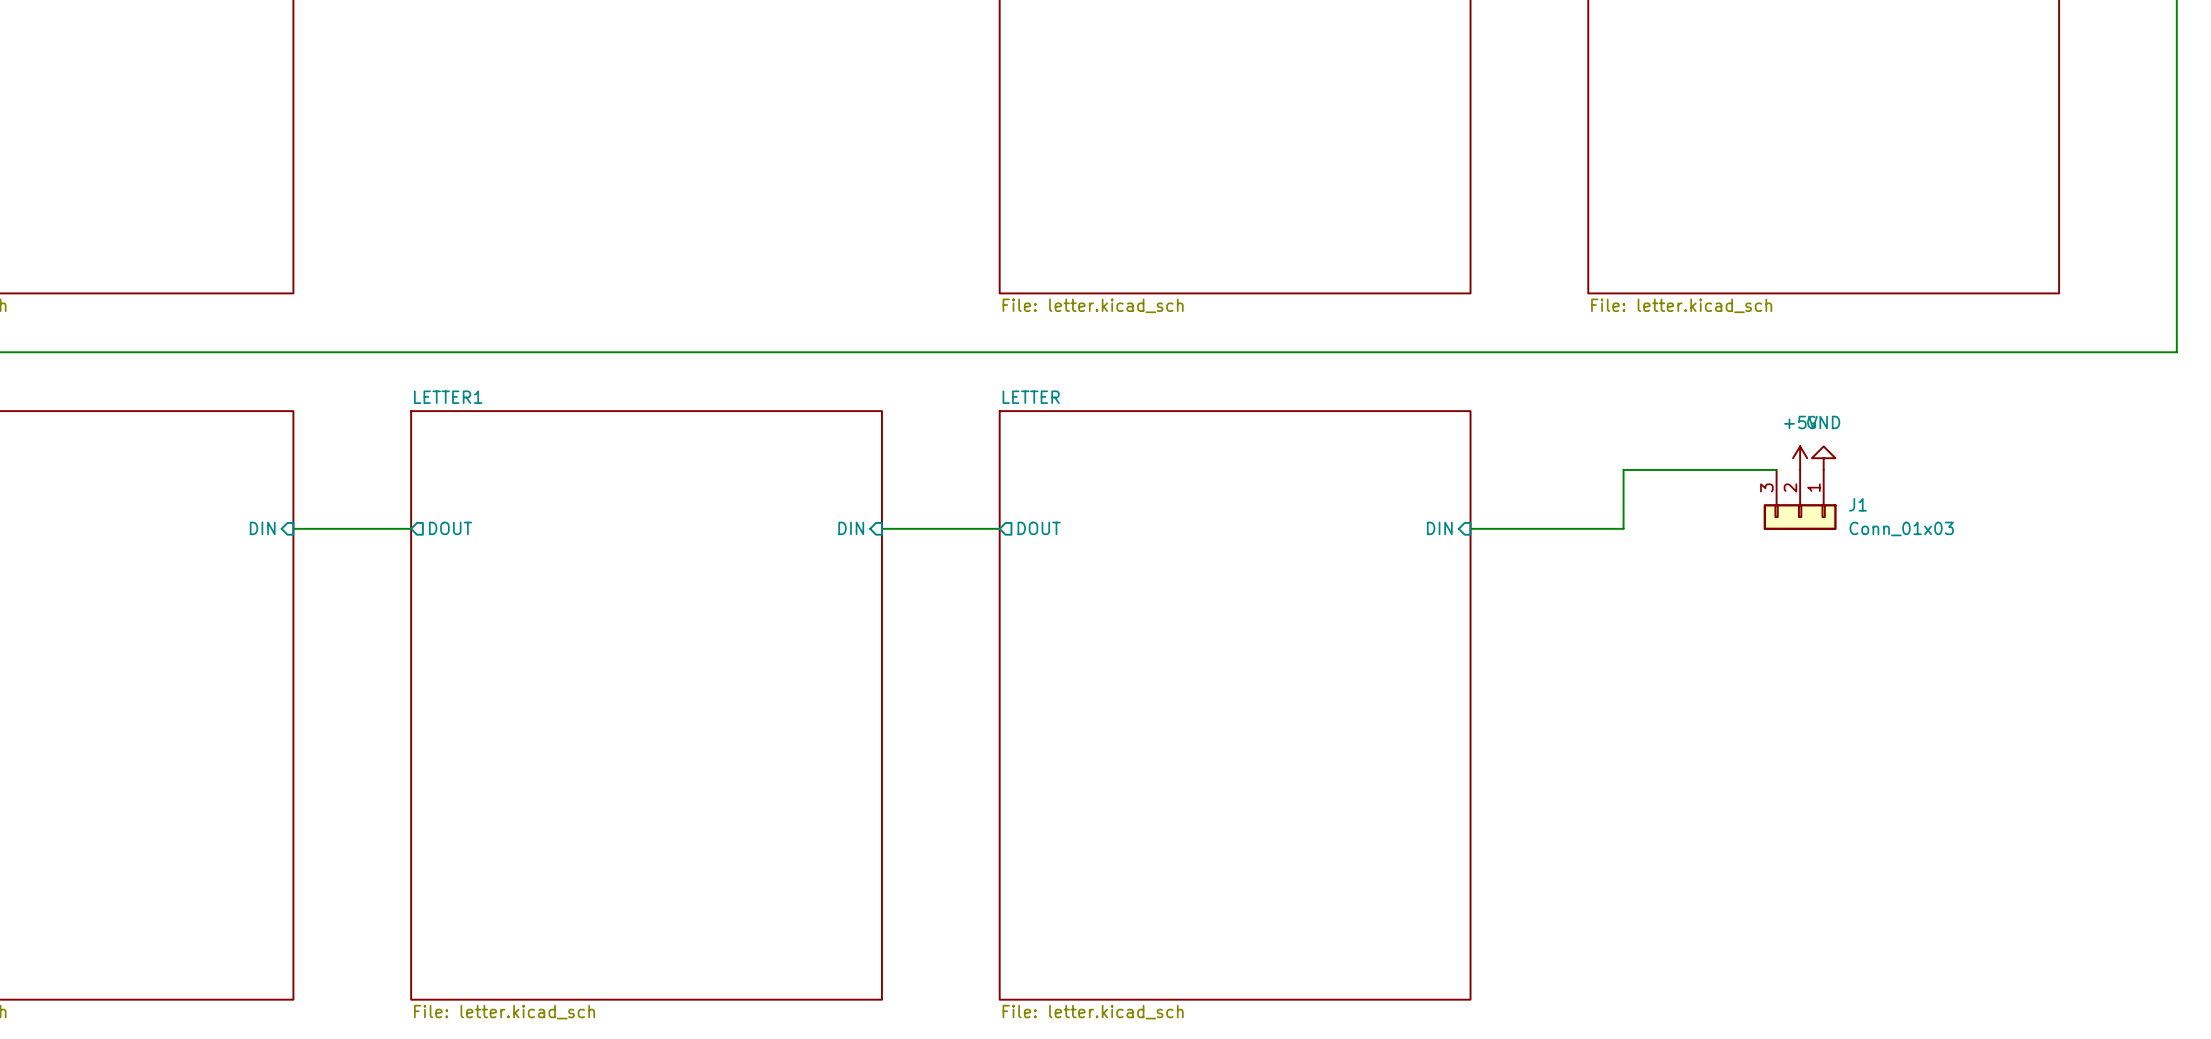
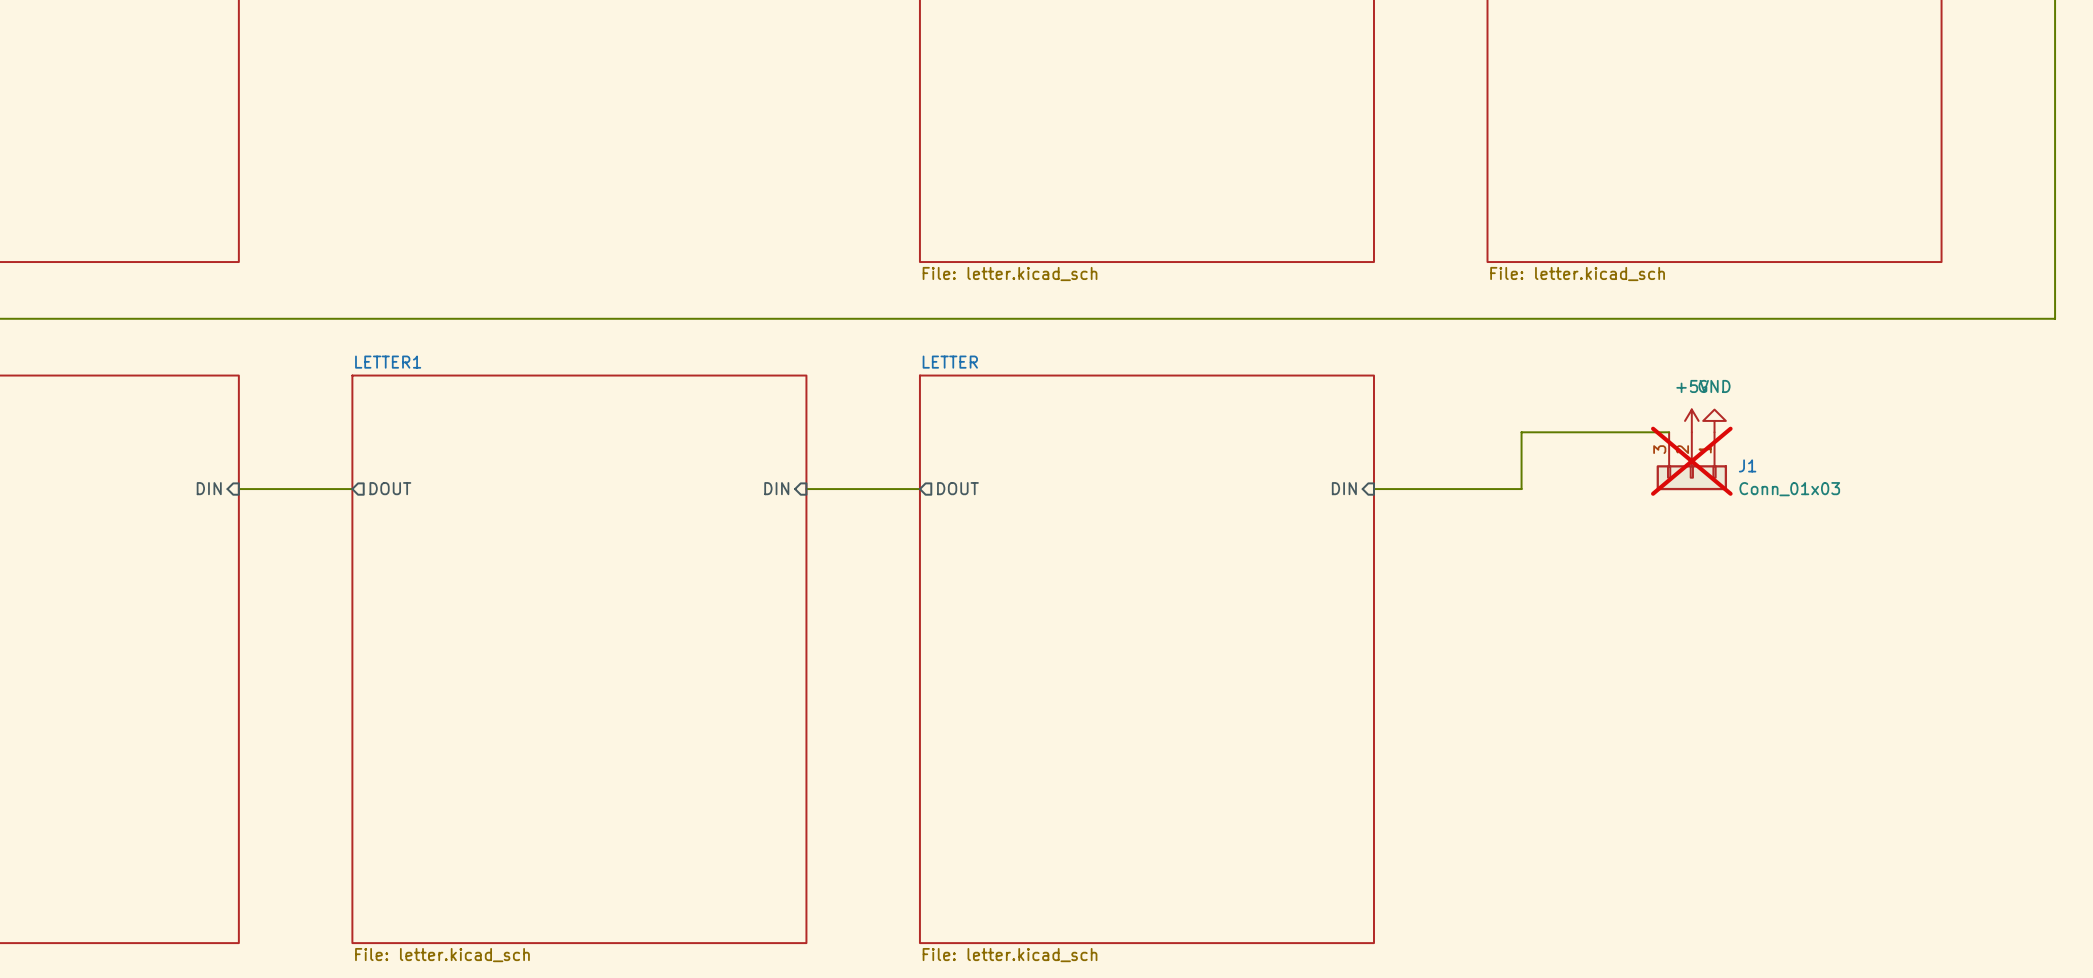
J1 do-not-place cross: none -> (1691, 461)

